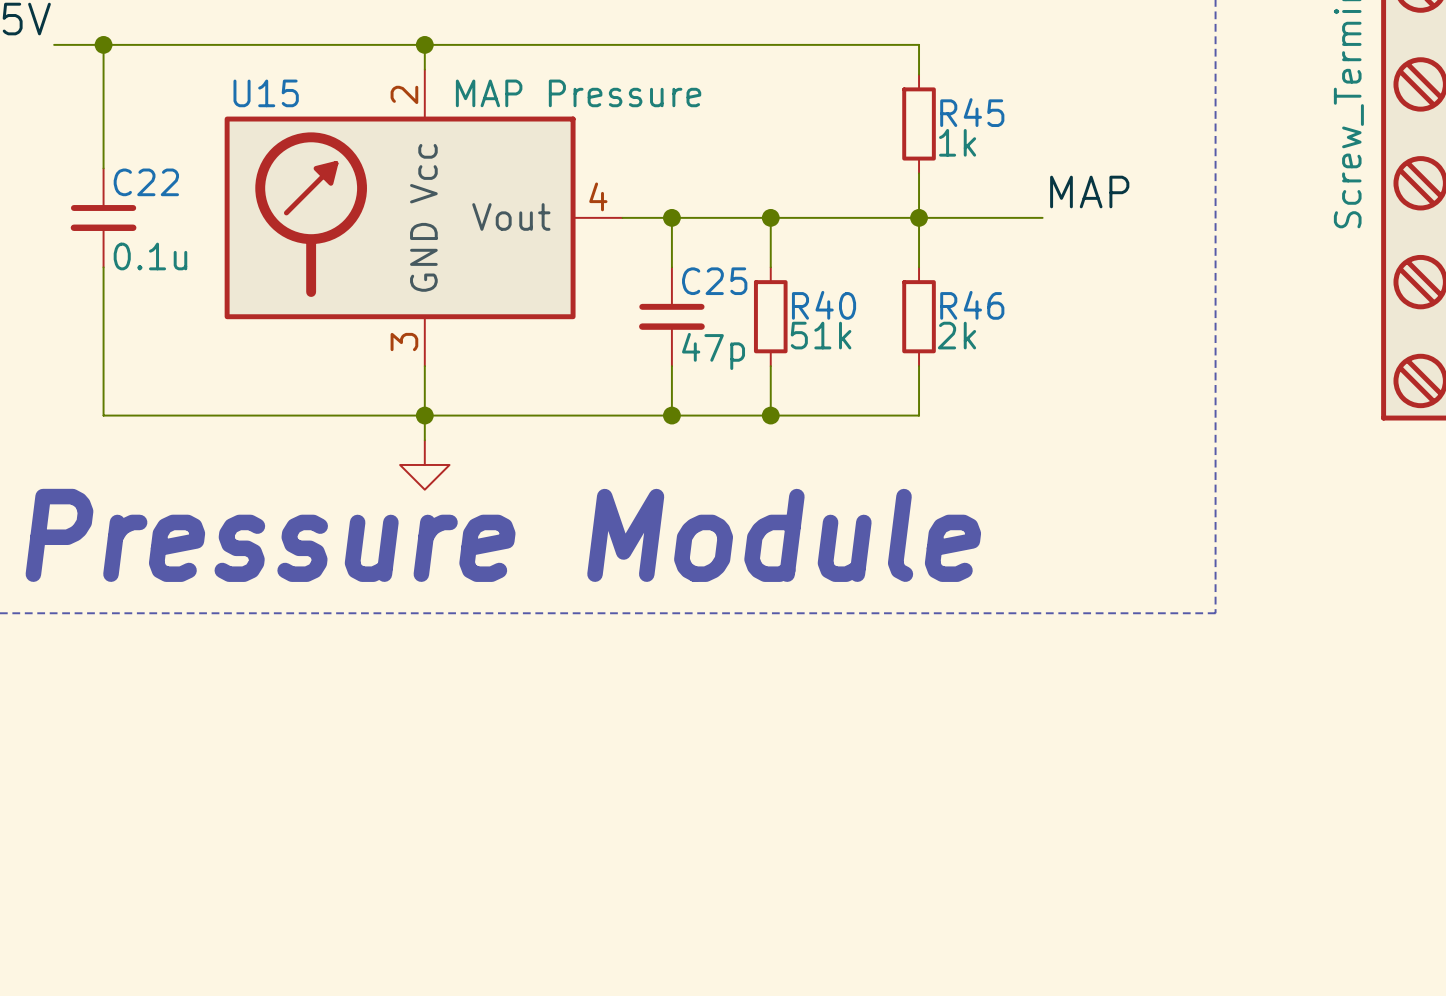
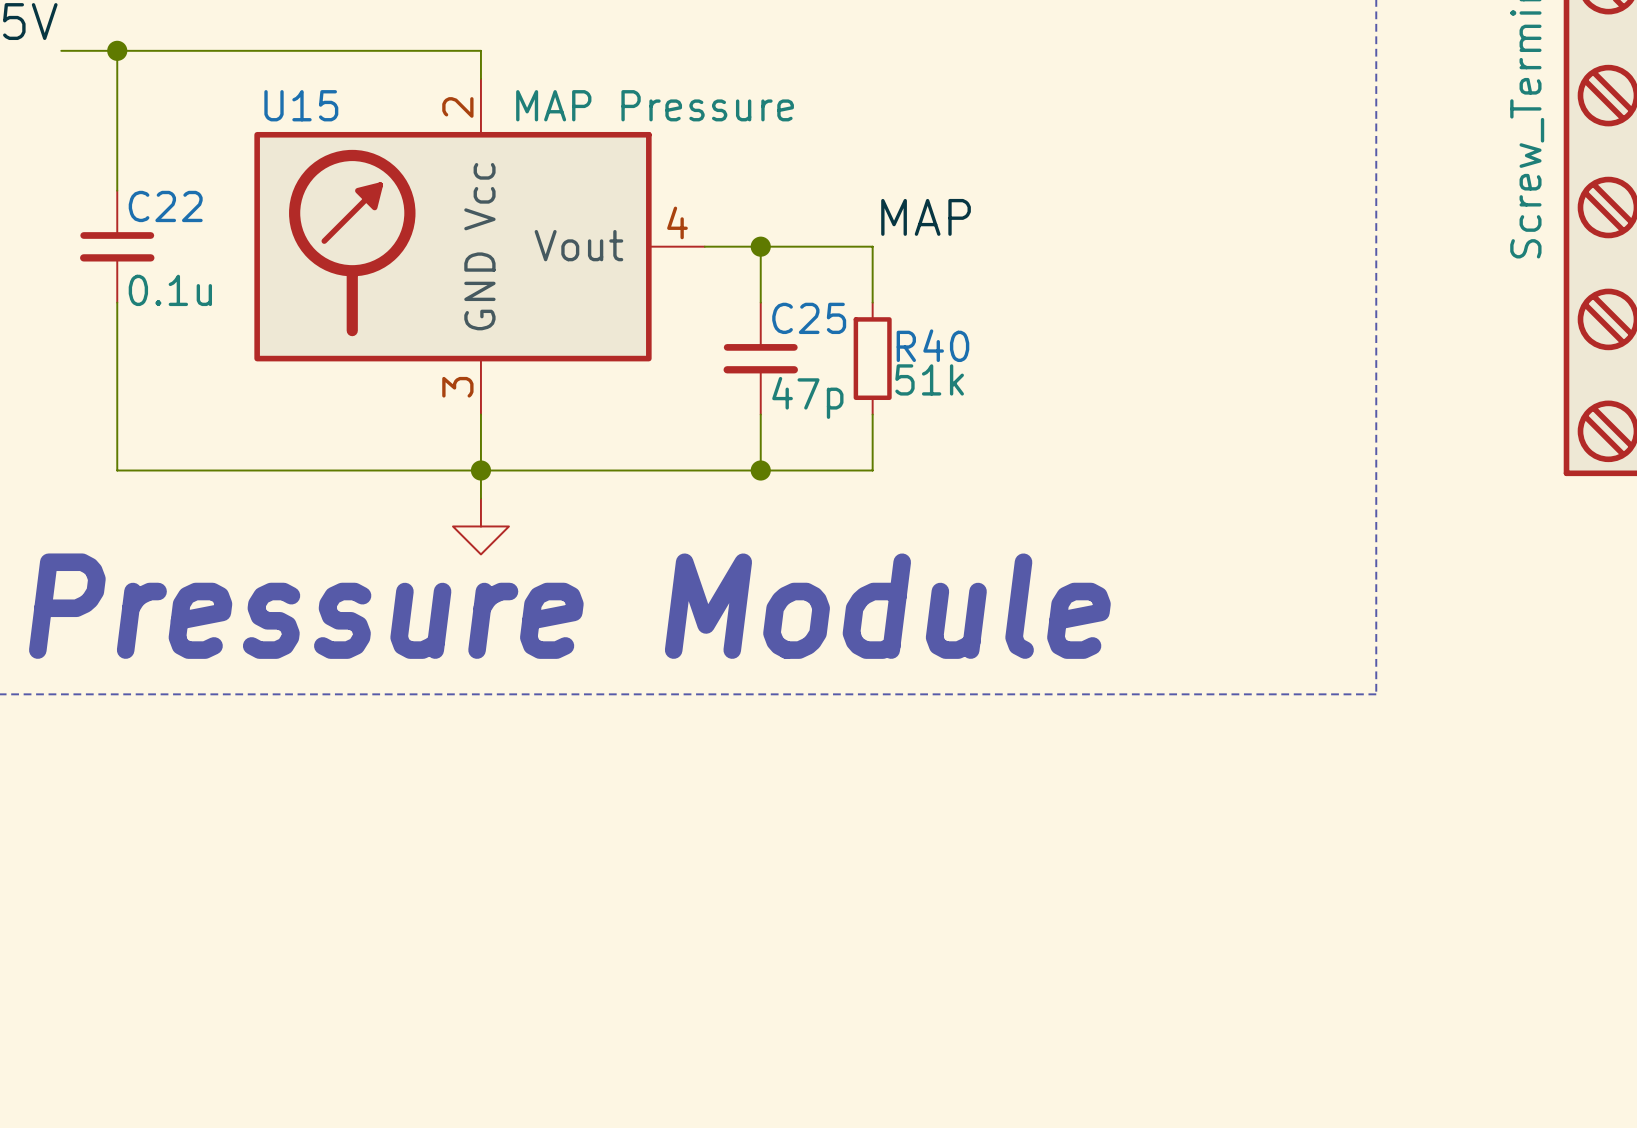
wire: (424, 44) (919, 44) (919, 74) -> none
junction: (424, 44) -> none
R45: 1k (919, 123) -> none
wire: (919, 173) (919, 267) -> none
label position: MAP (1089, 192) -> MAP (926, 217)
wire: (770, 217) (1042, 217) -> none
junction: (770, 217) -> none
junction: (919, 217) -> none
R46: 2k (919, 316) -> none
wire: (919, 366) (919, 415) (770, 415) -> none
junction: (770, 415) -> none

